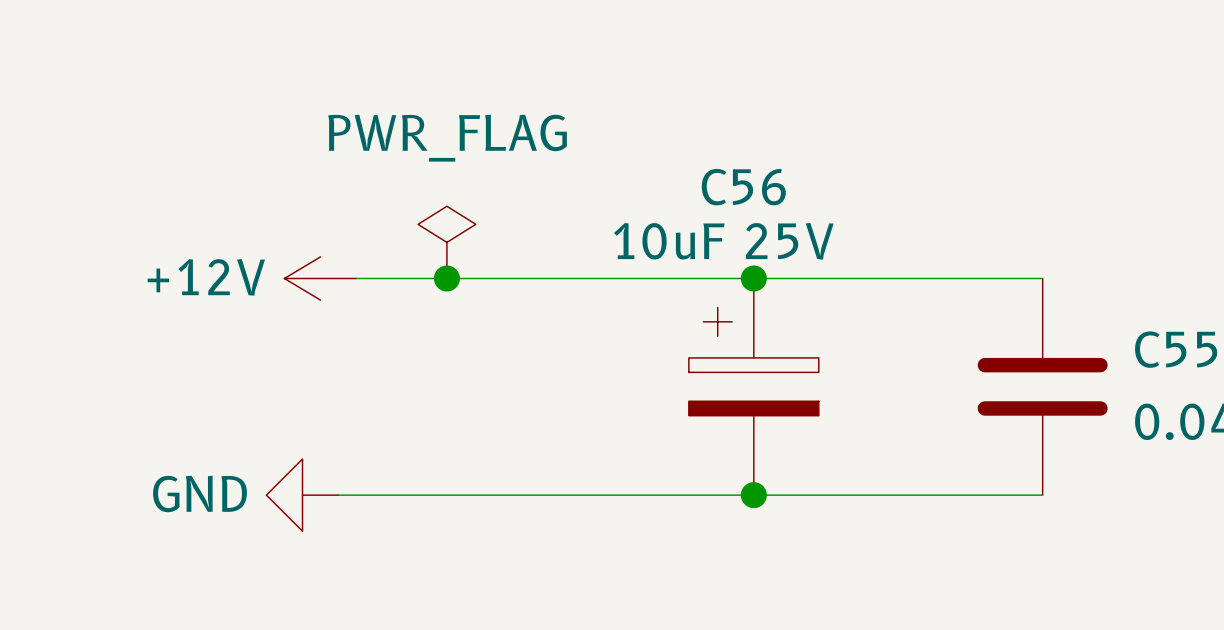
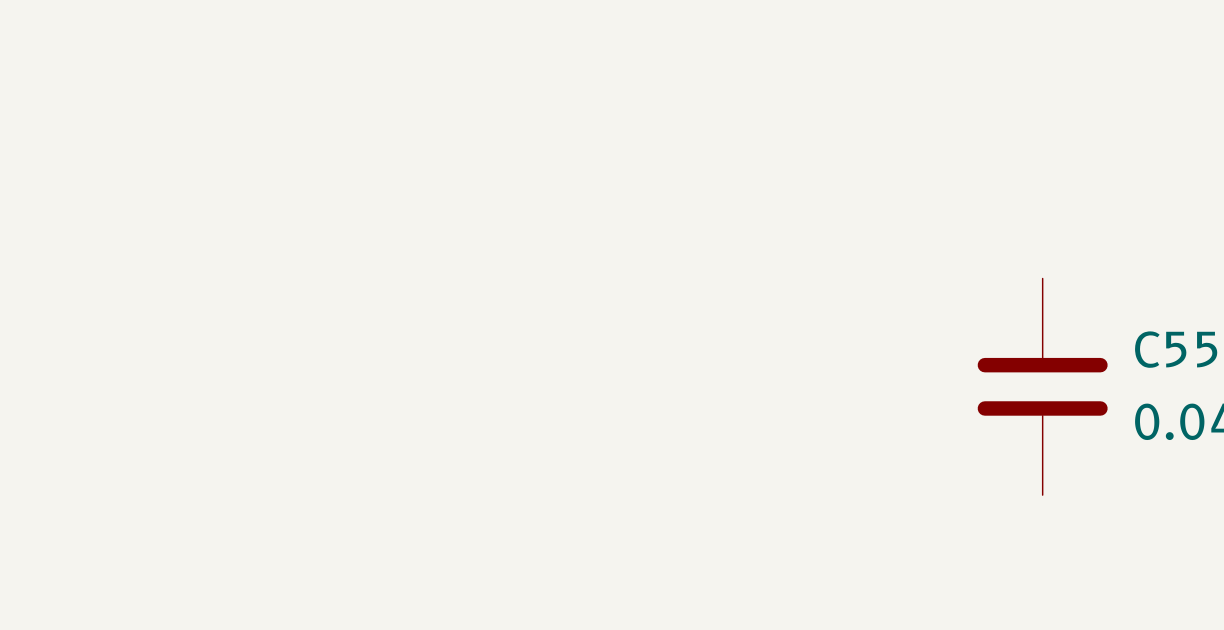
power symbol: PWR_FLAG (446, 242) -> none
power symbol: +12V (320, 278) -> none
wire: (356, 278) (1042, 278) -> none
junction: (446, 278) -> none
junction: (753, 278) -> none
C56: 10uF 25V (753, 386) -> none
power symbol: GND (302, 495) -> none
wire: (338, 495) (1042, 495) -> none
junction: (753, 495) -> none

